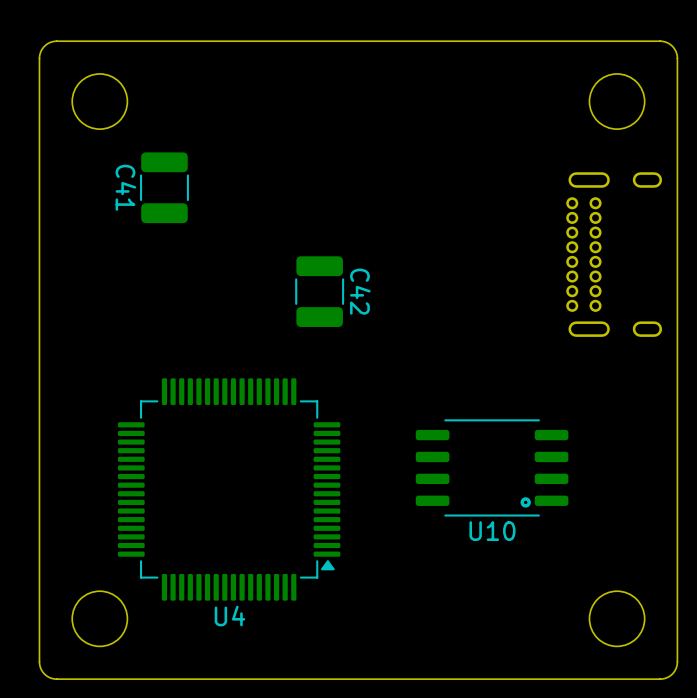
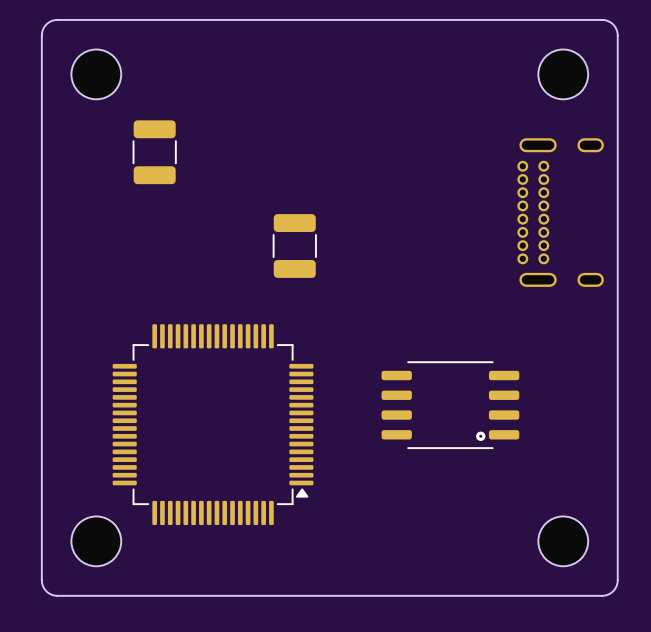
C41 name: C41 (125, 187) -> none
C42 name: C42 (360, 291) -> none
U10 name: U10 (492, 531) -> none
U4 name: U4 (229, 616) -> none

